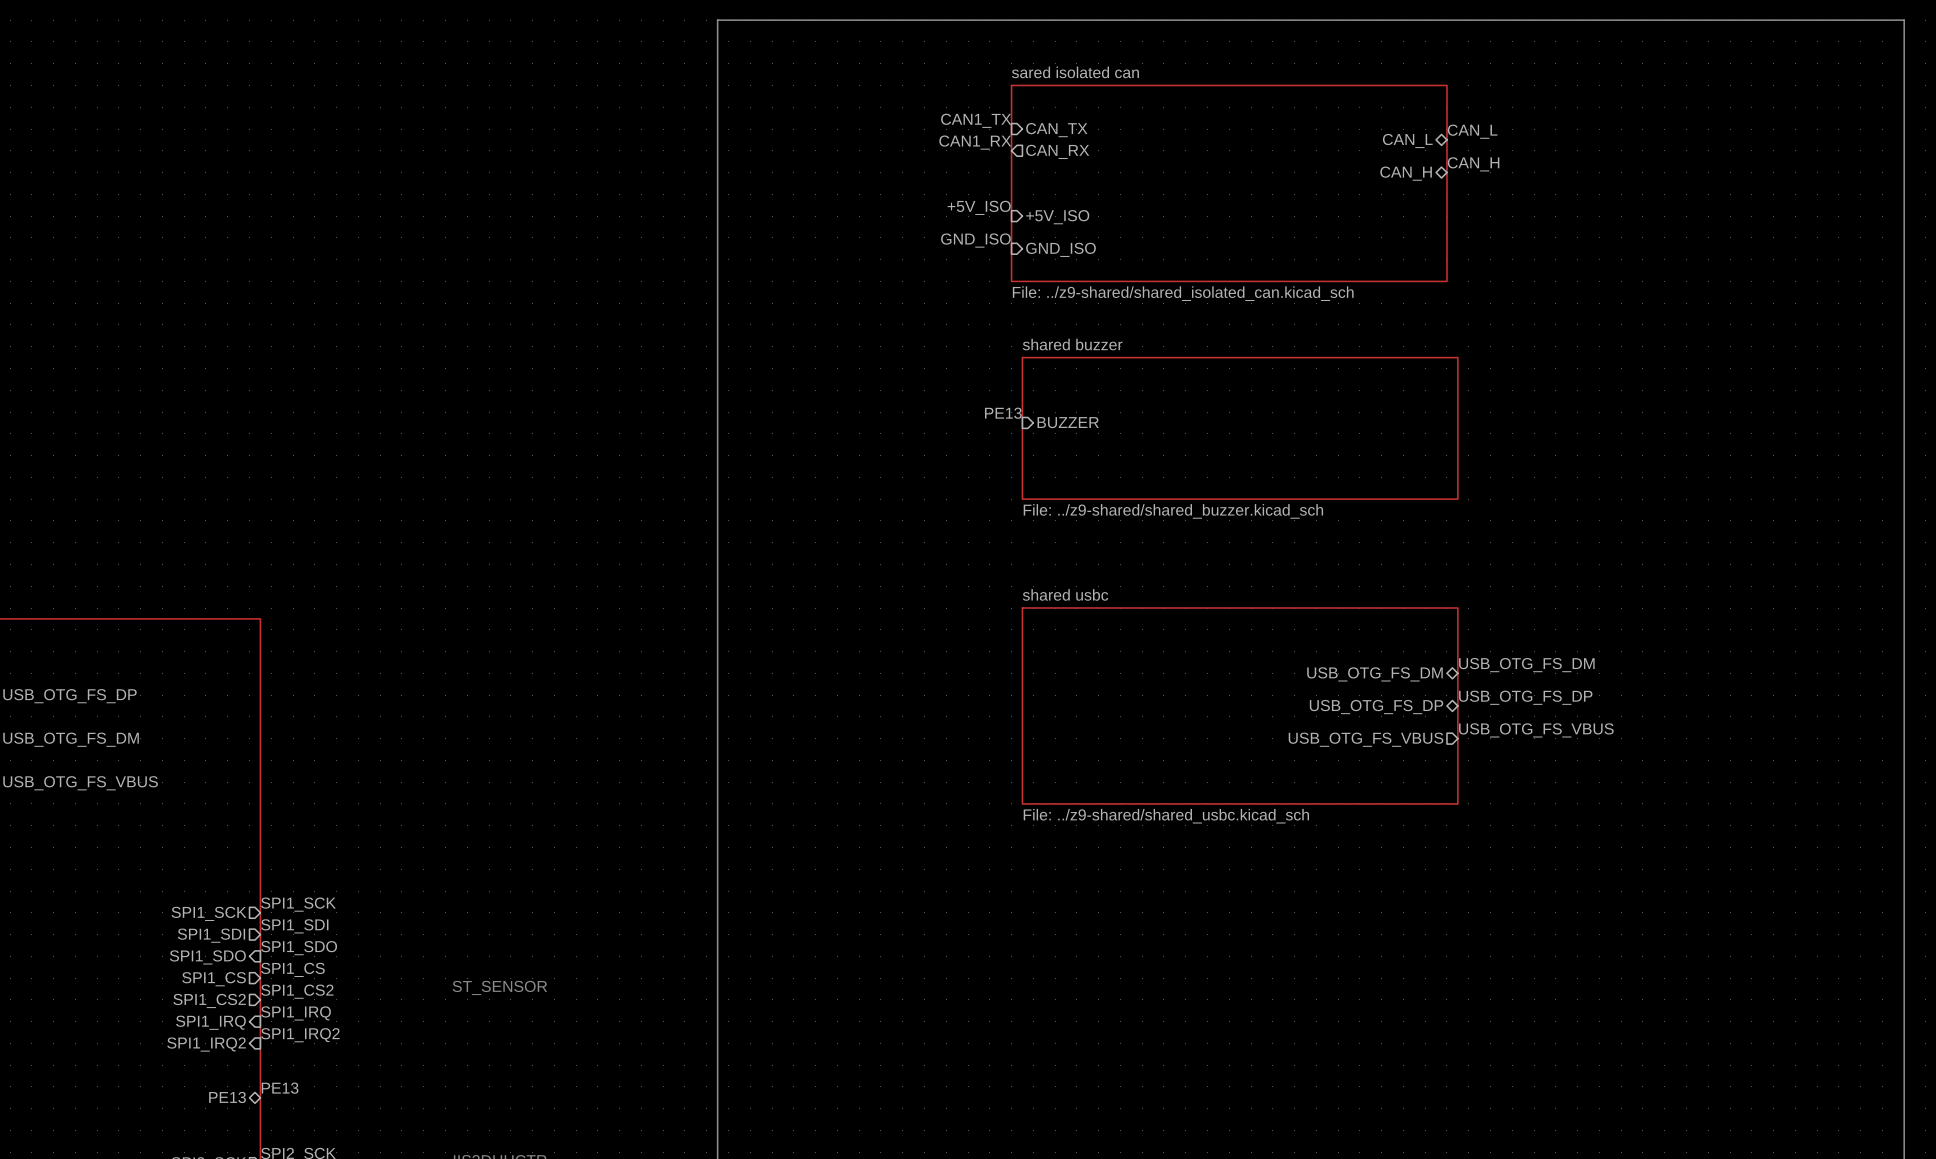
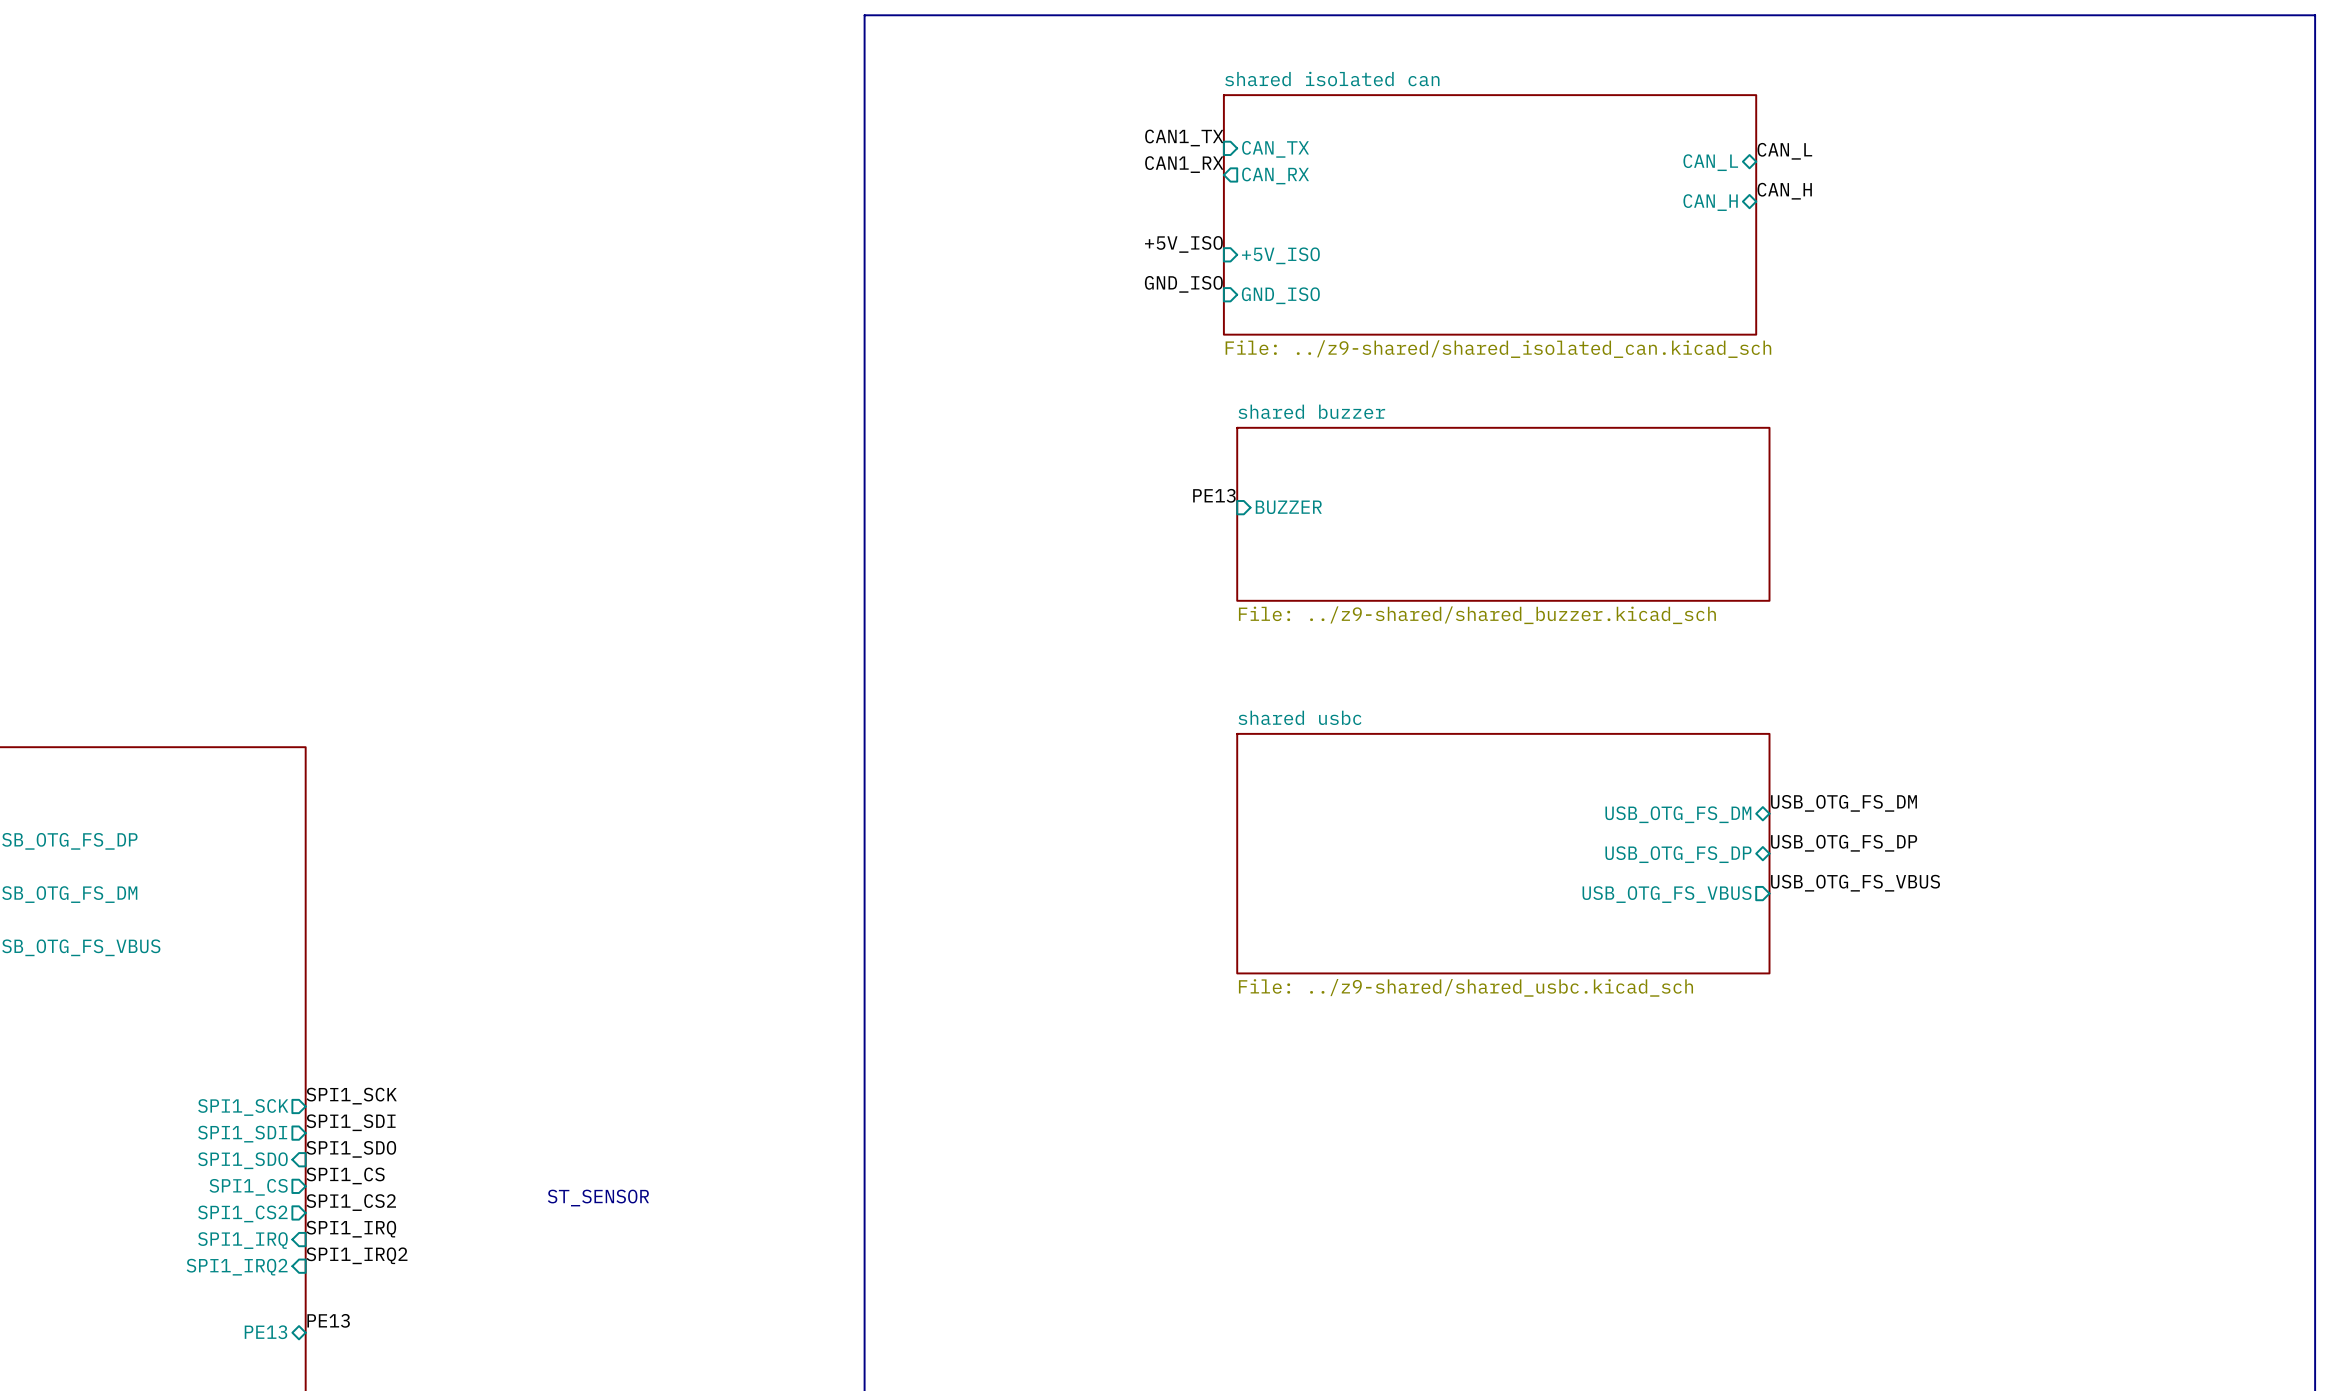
sheet sared isolated can name: sared isolated can (1075, 72) -> shared isolated can (1332, 79)

